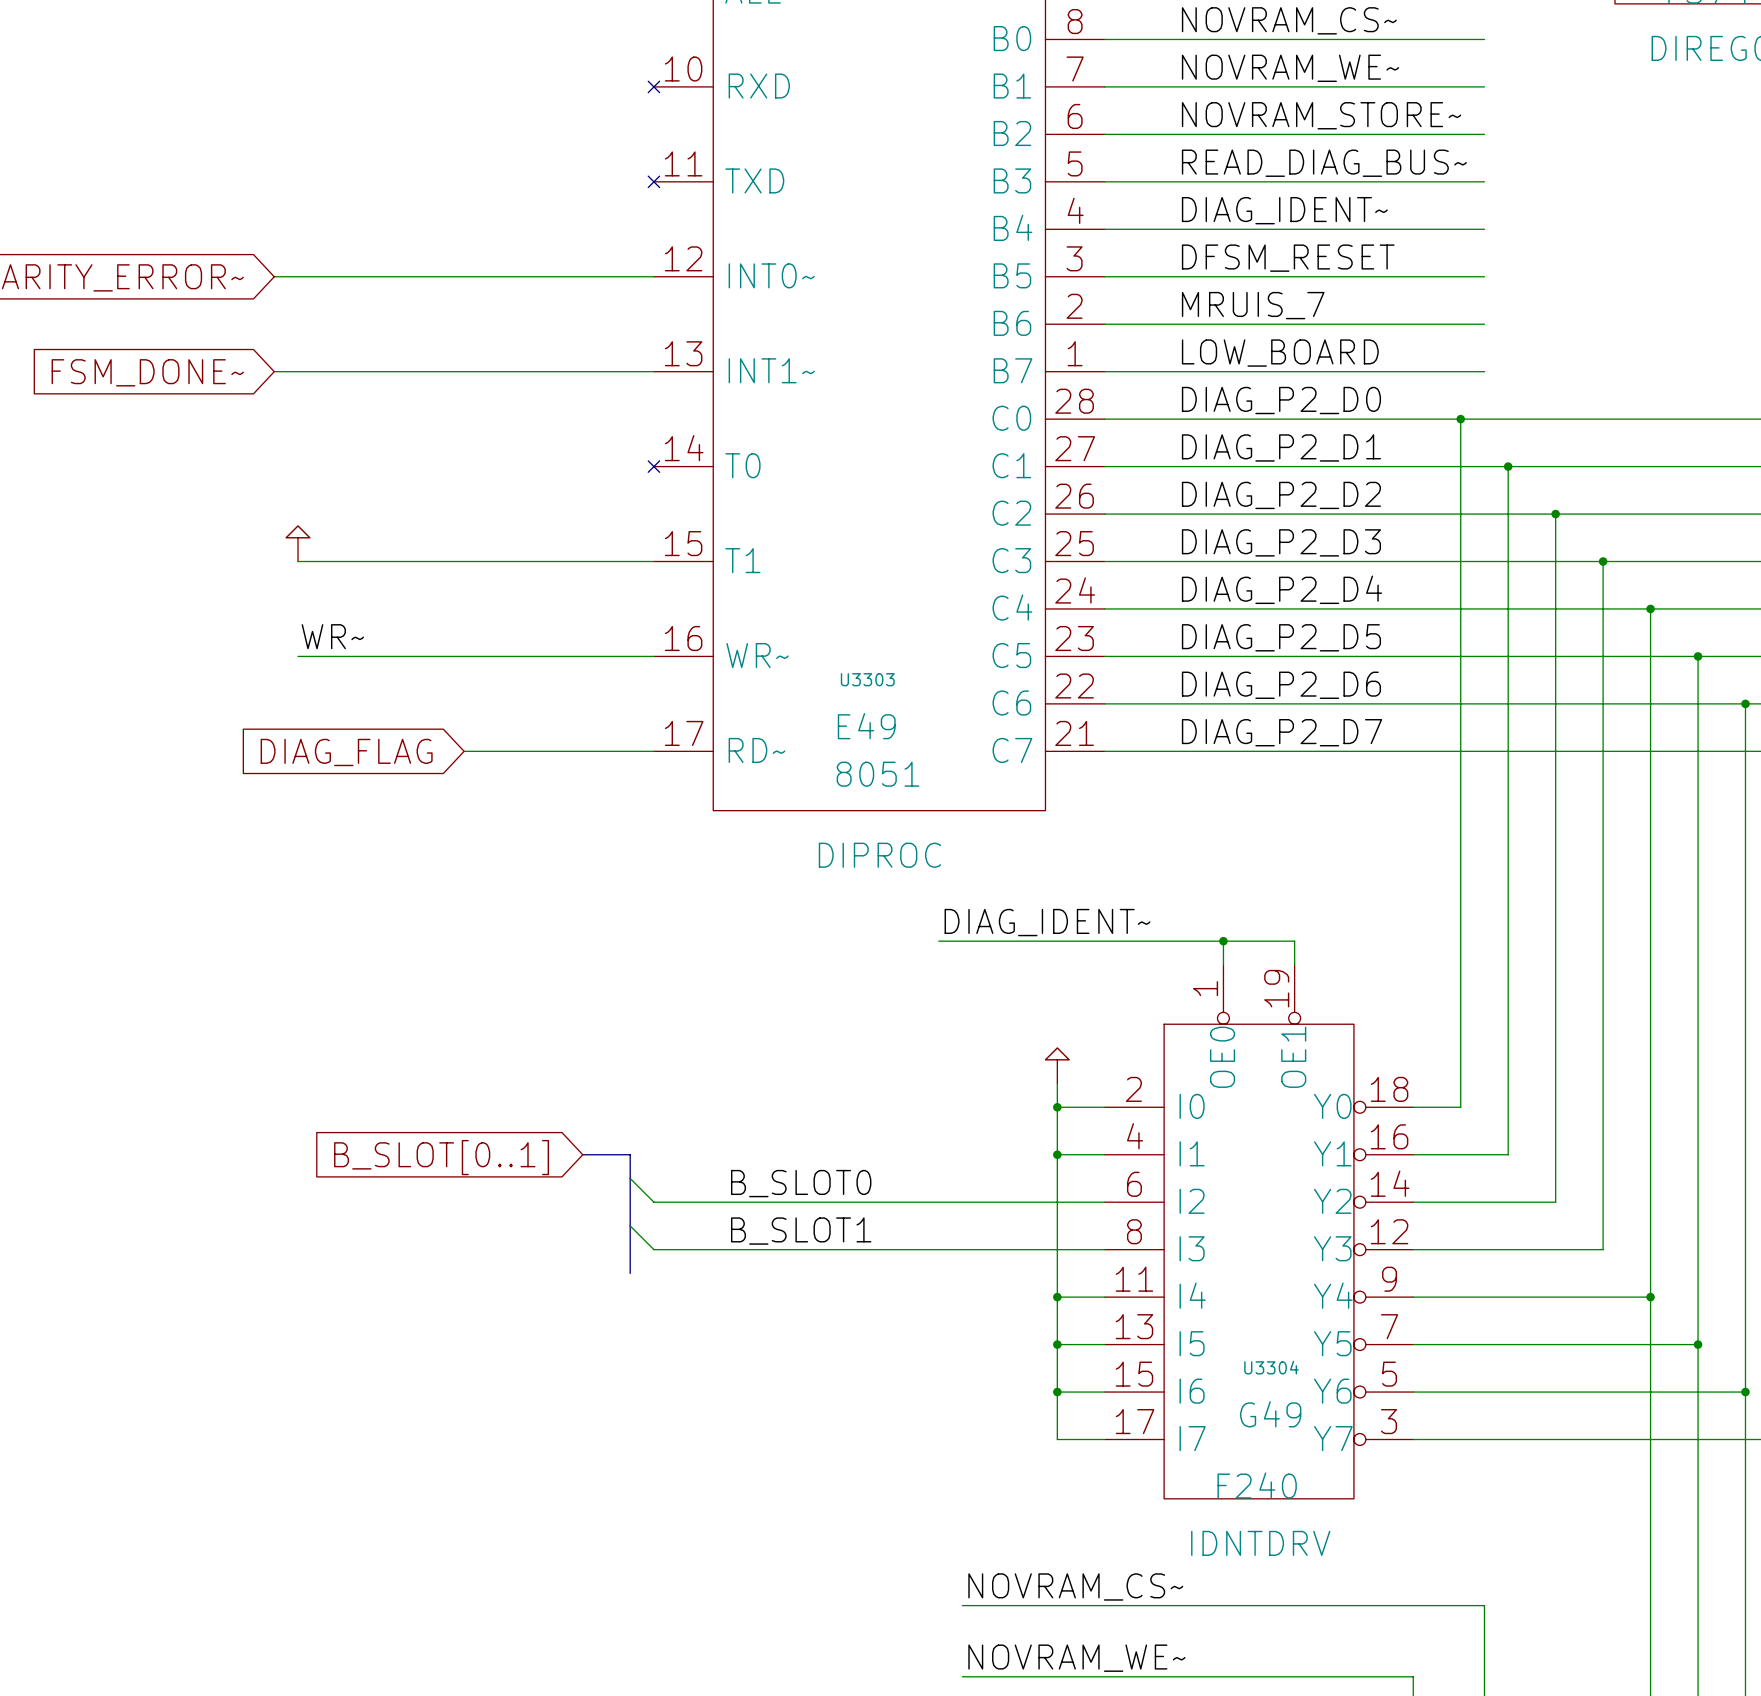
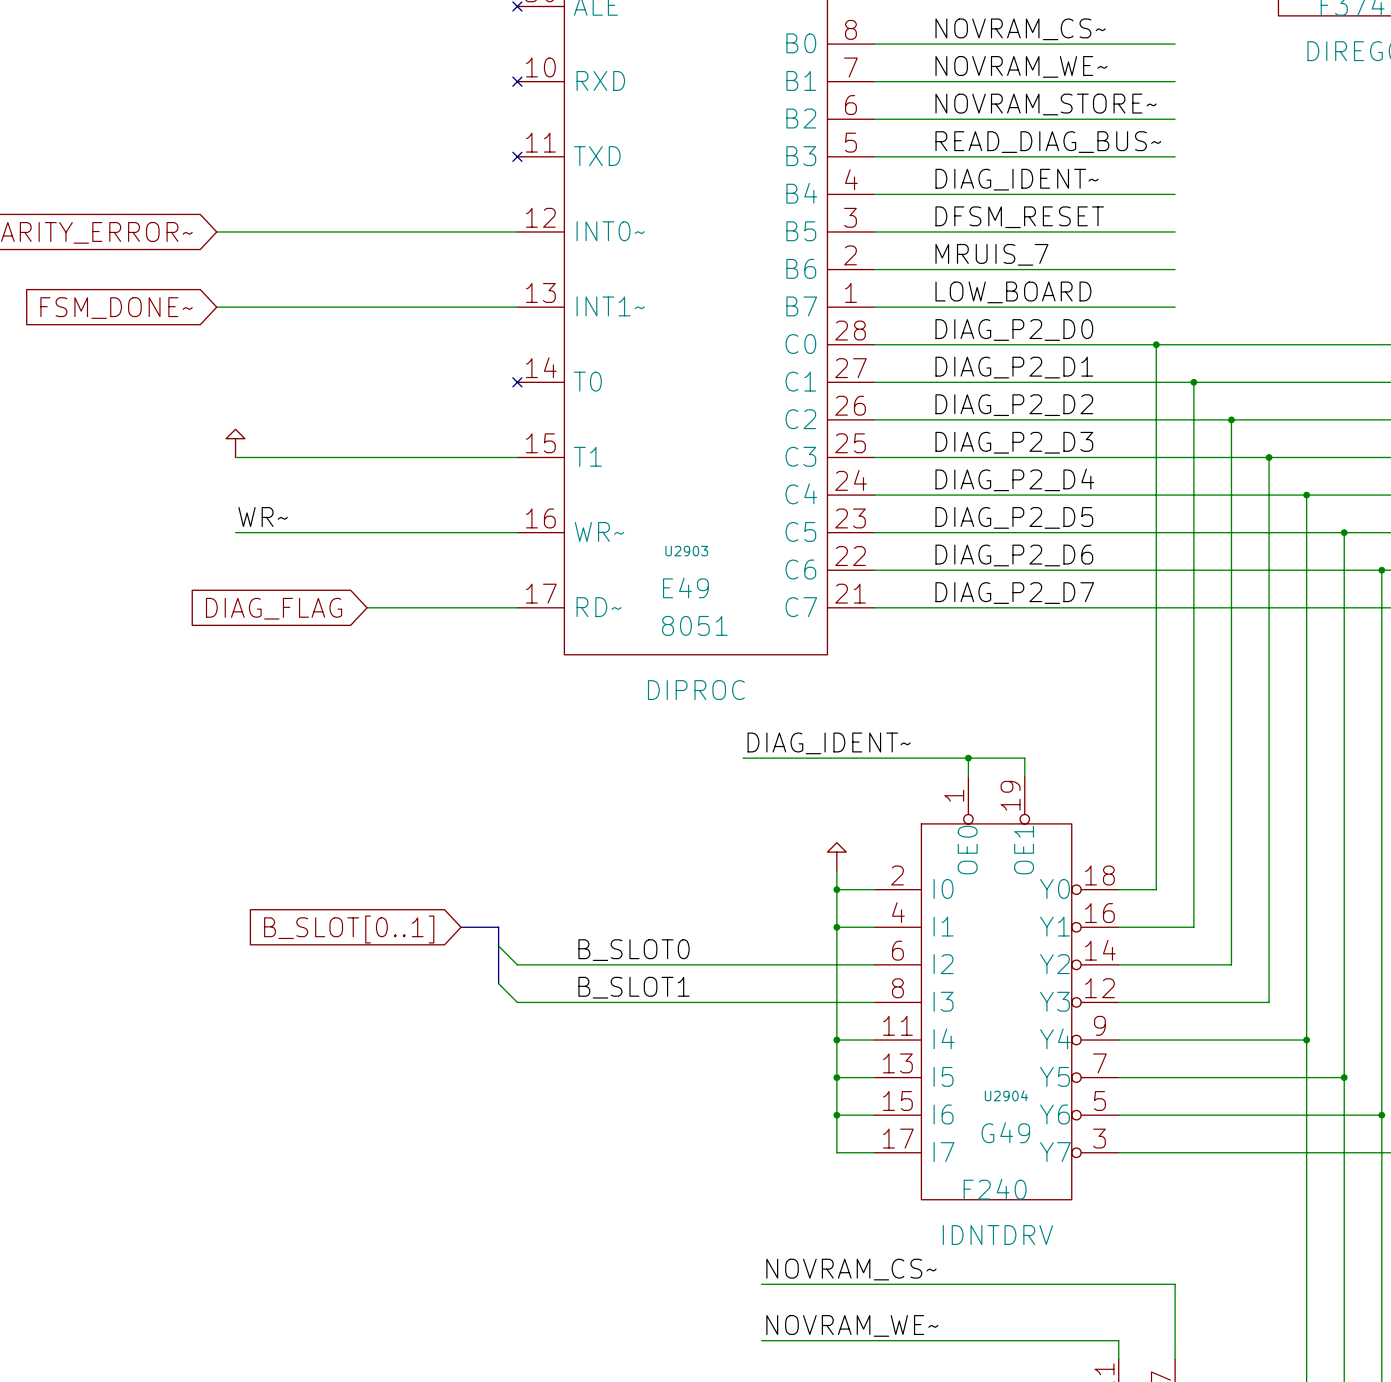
U3303 name: U3303 (867, 679) -> U2903 (686, 551)
bus: (630, 1225) (630, 1273) -> none
U3304 name: U3304 (1271, 1367) -> U2904 (1006, 1095)

